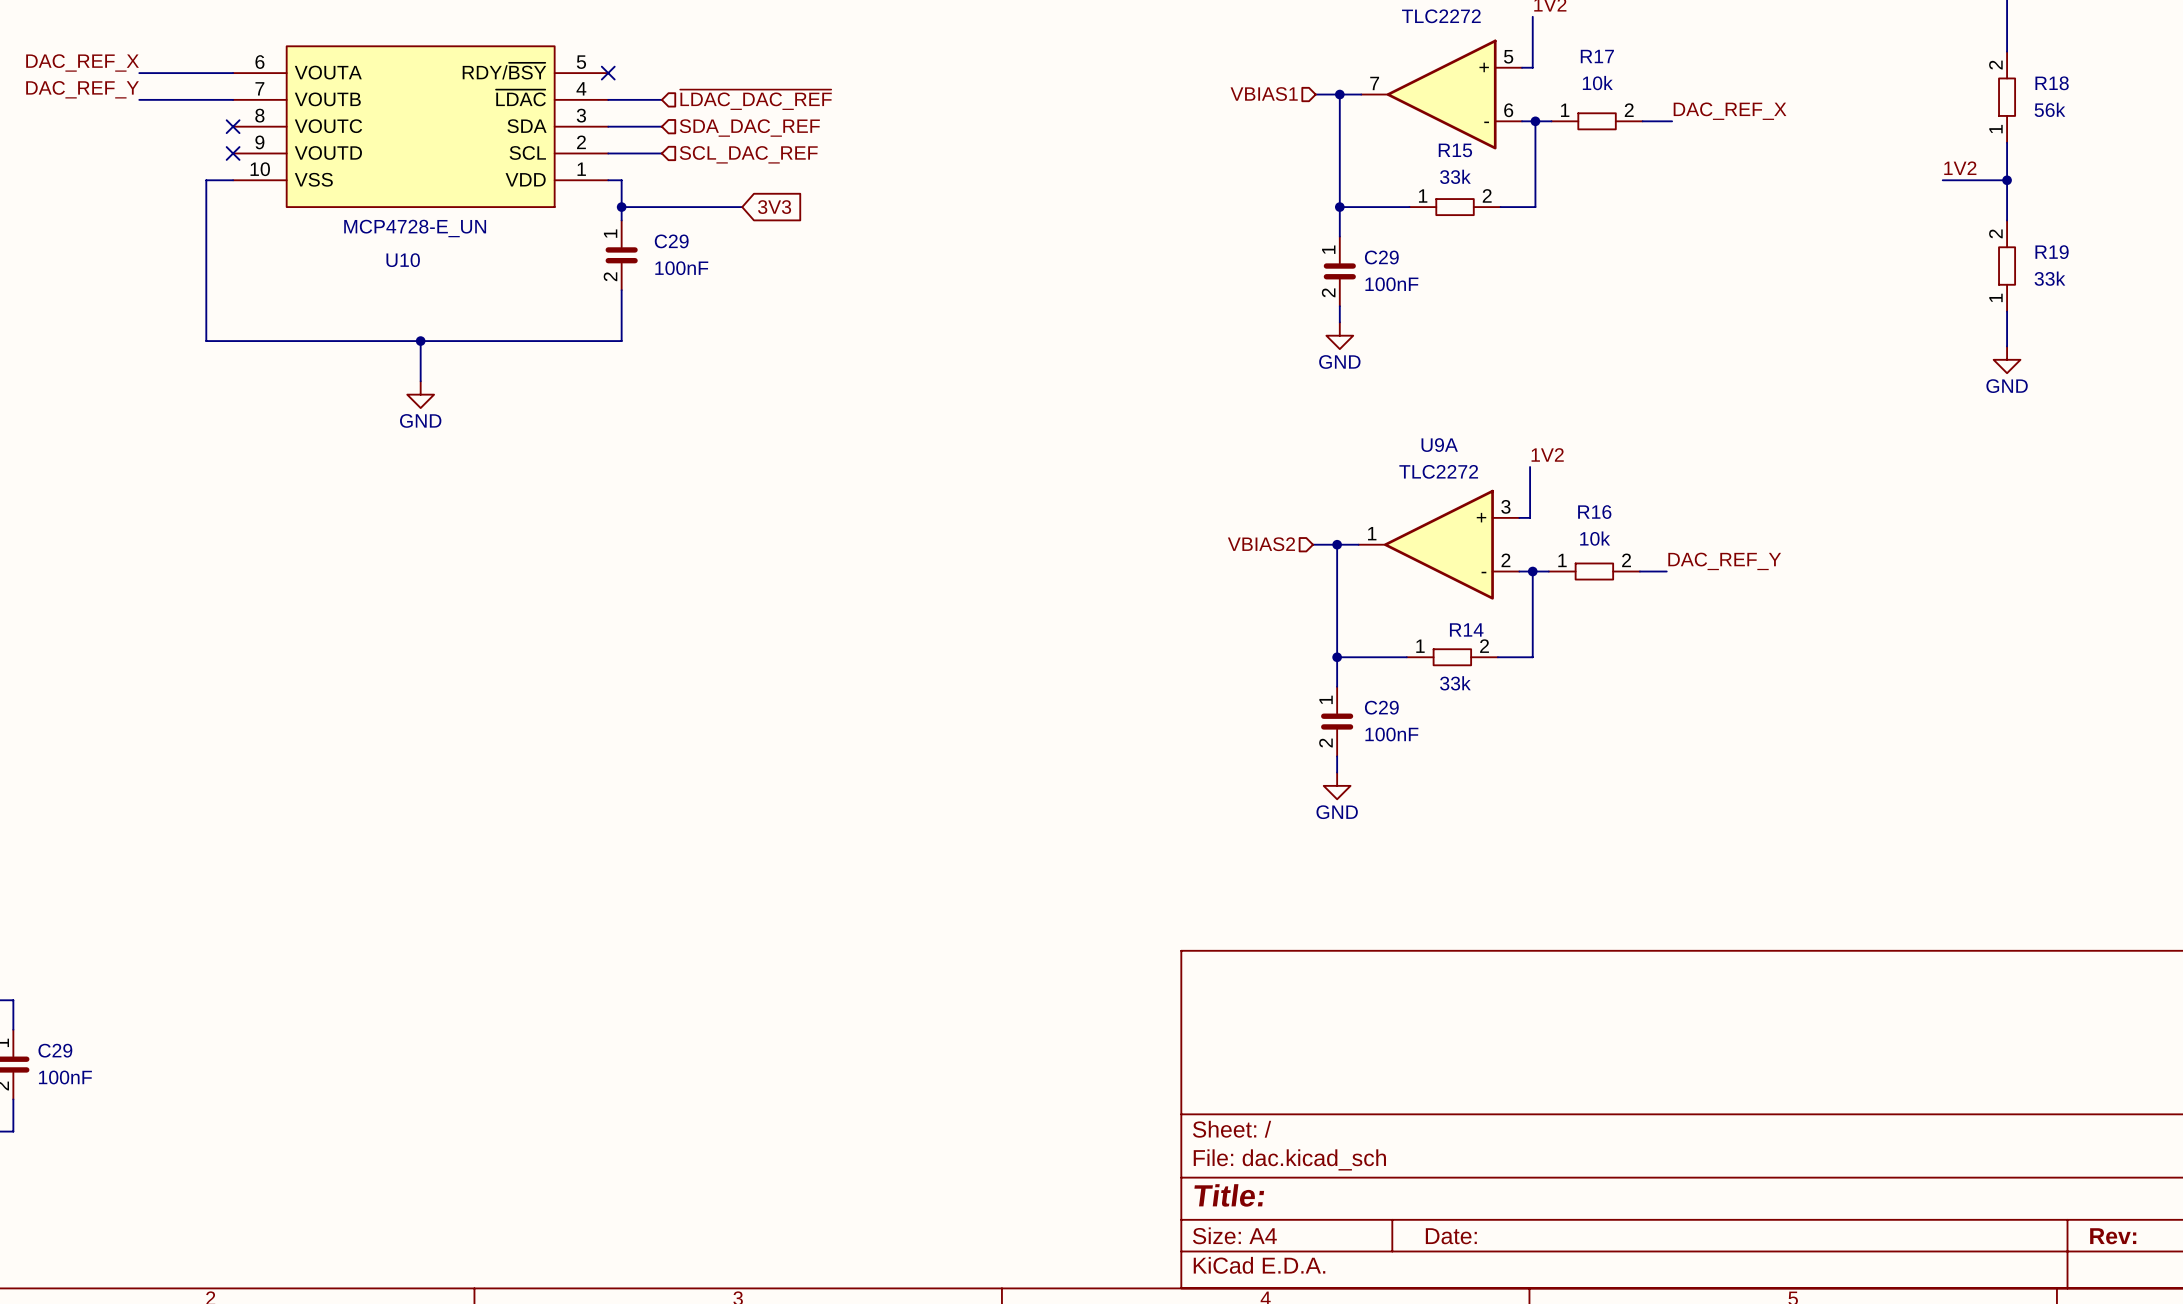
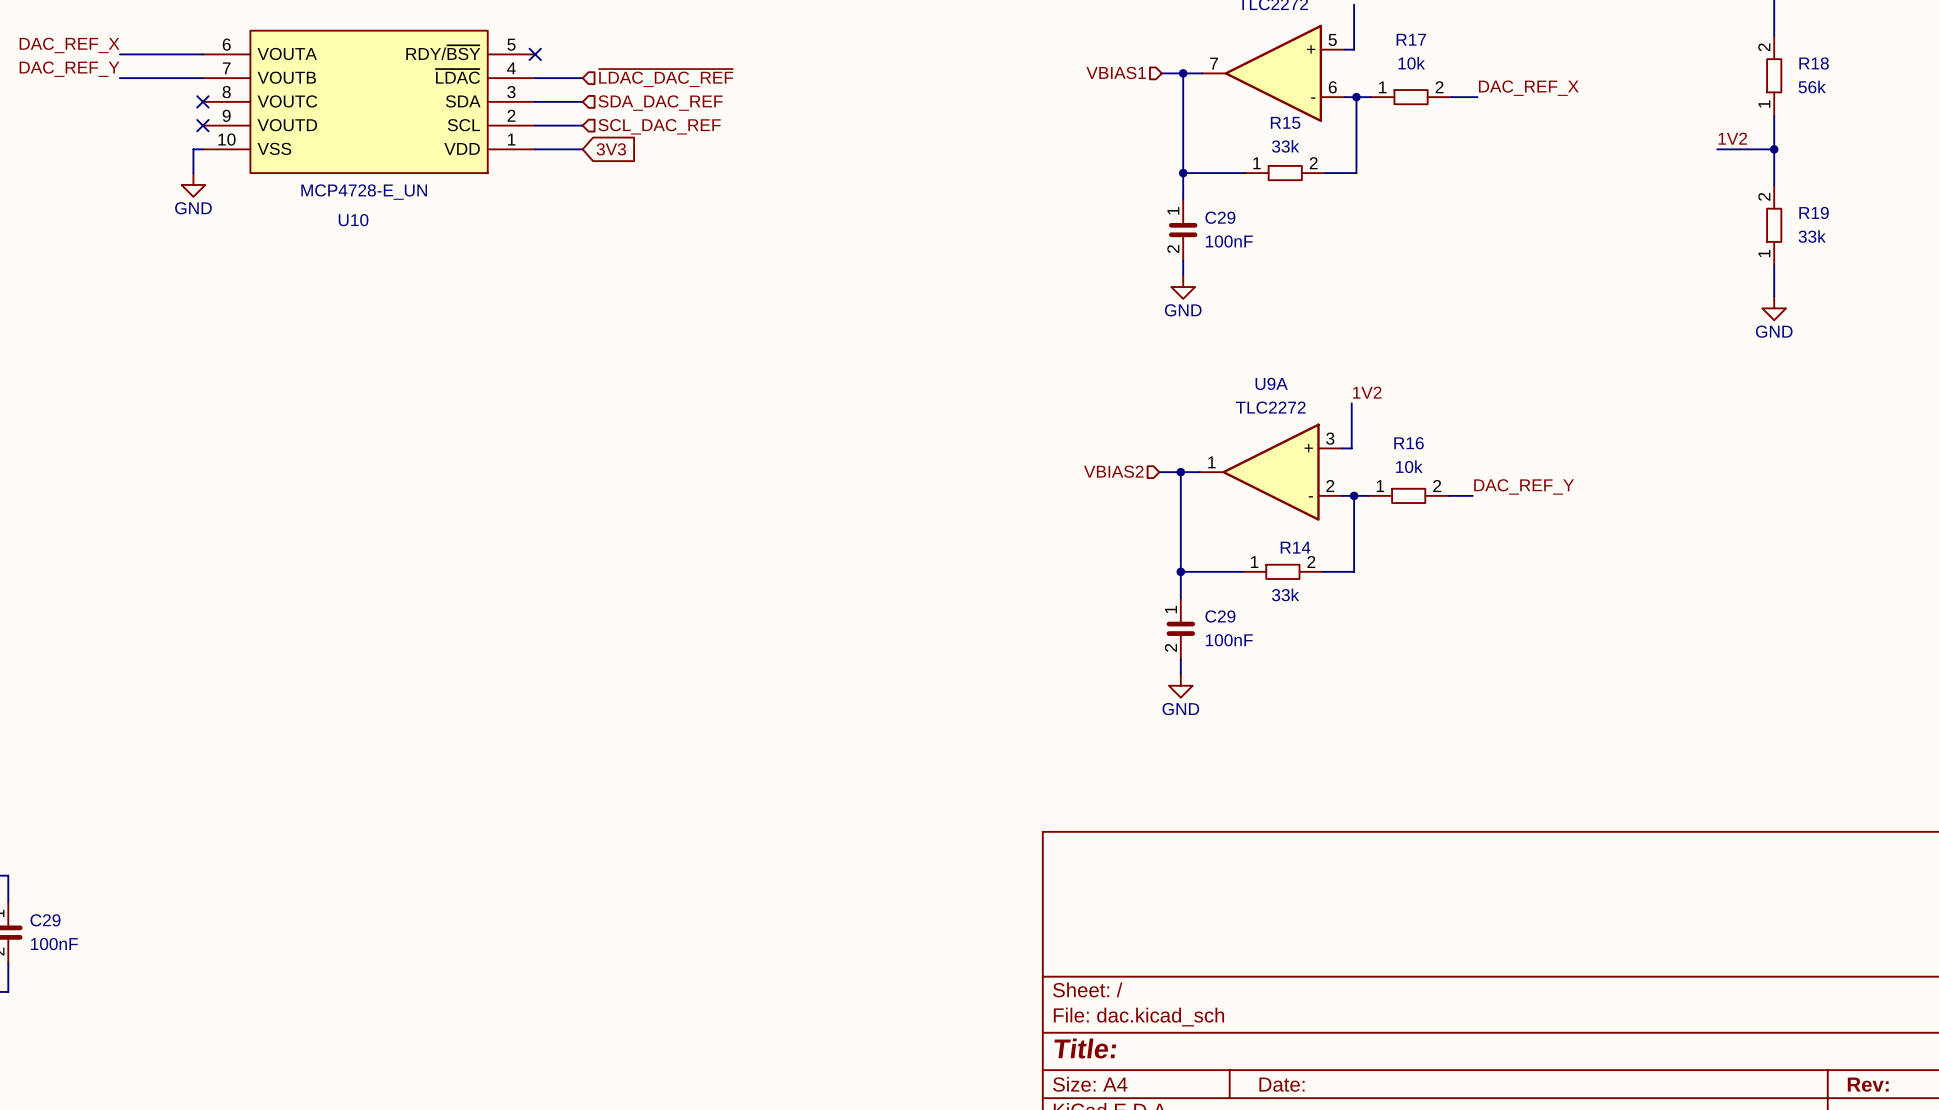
wire: (222, 180) (206, 180) (206, 341) (621, 341) (621, 290) -> (193, 149) (193, 173)
wire: (621, 180) (621, 220) -> (547, 149) (582, 149)
wire: (621, 207) (742, 207) -> none
junction: (621, 207) -> none
global label position: 3V3 (774, 207) -> 3V3 (611, 149)
power symbol: none -> GND (193, 184)
C29: (621, 255) -> none
wire: (420, 341) (420, 381) -> none
junction: (420, 341) -> none
power symbol: GND (420, 394) -> none

